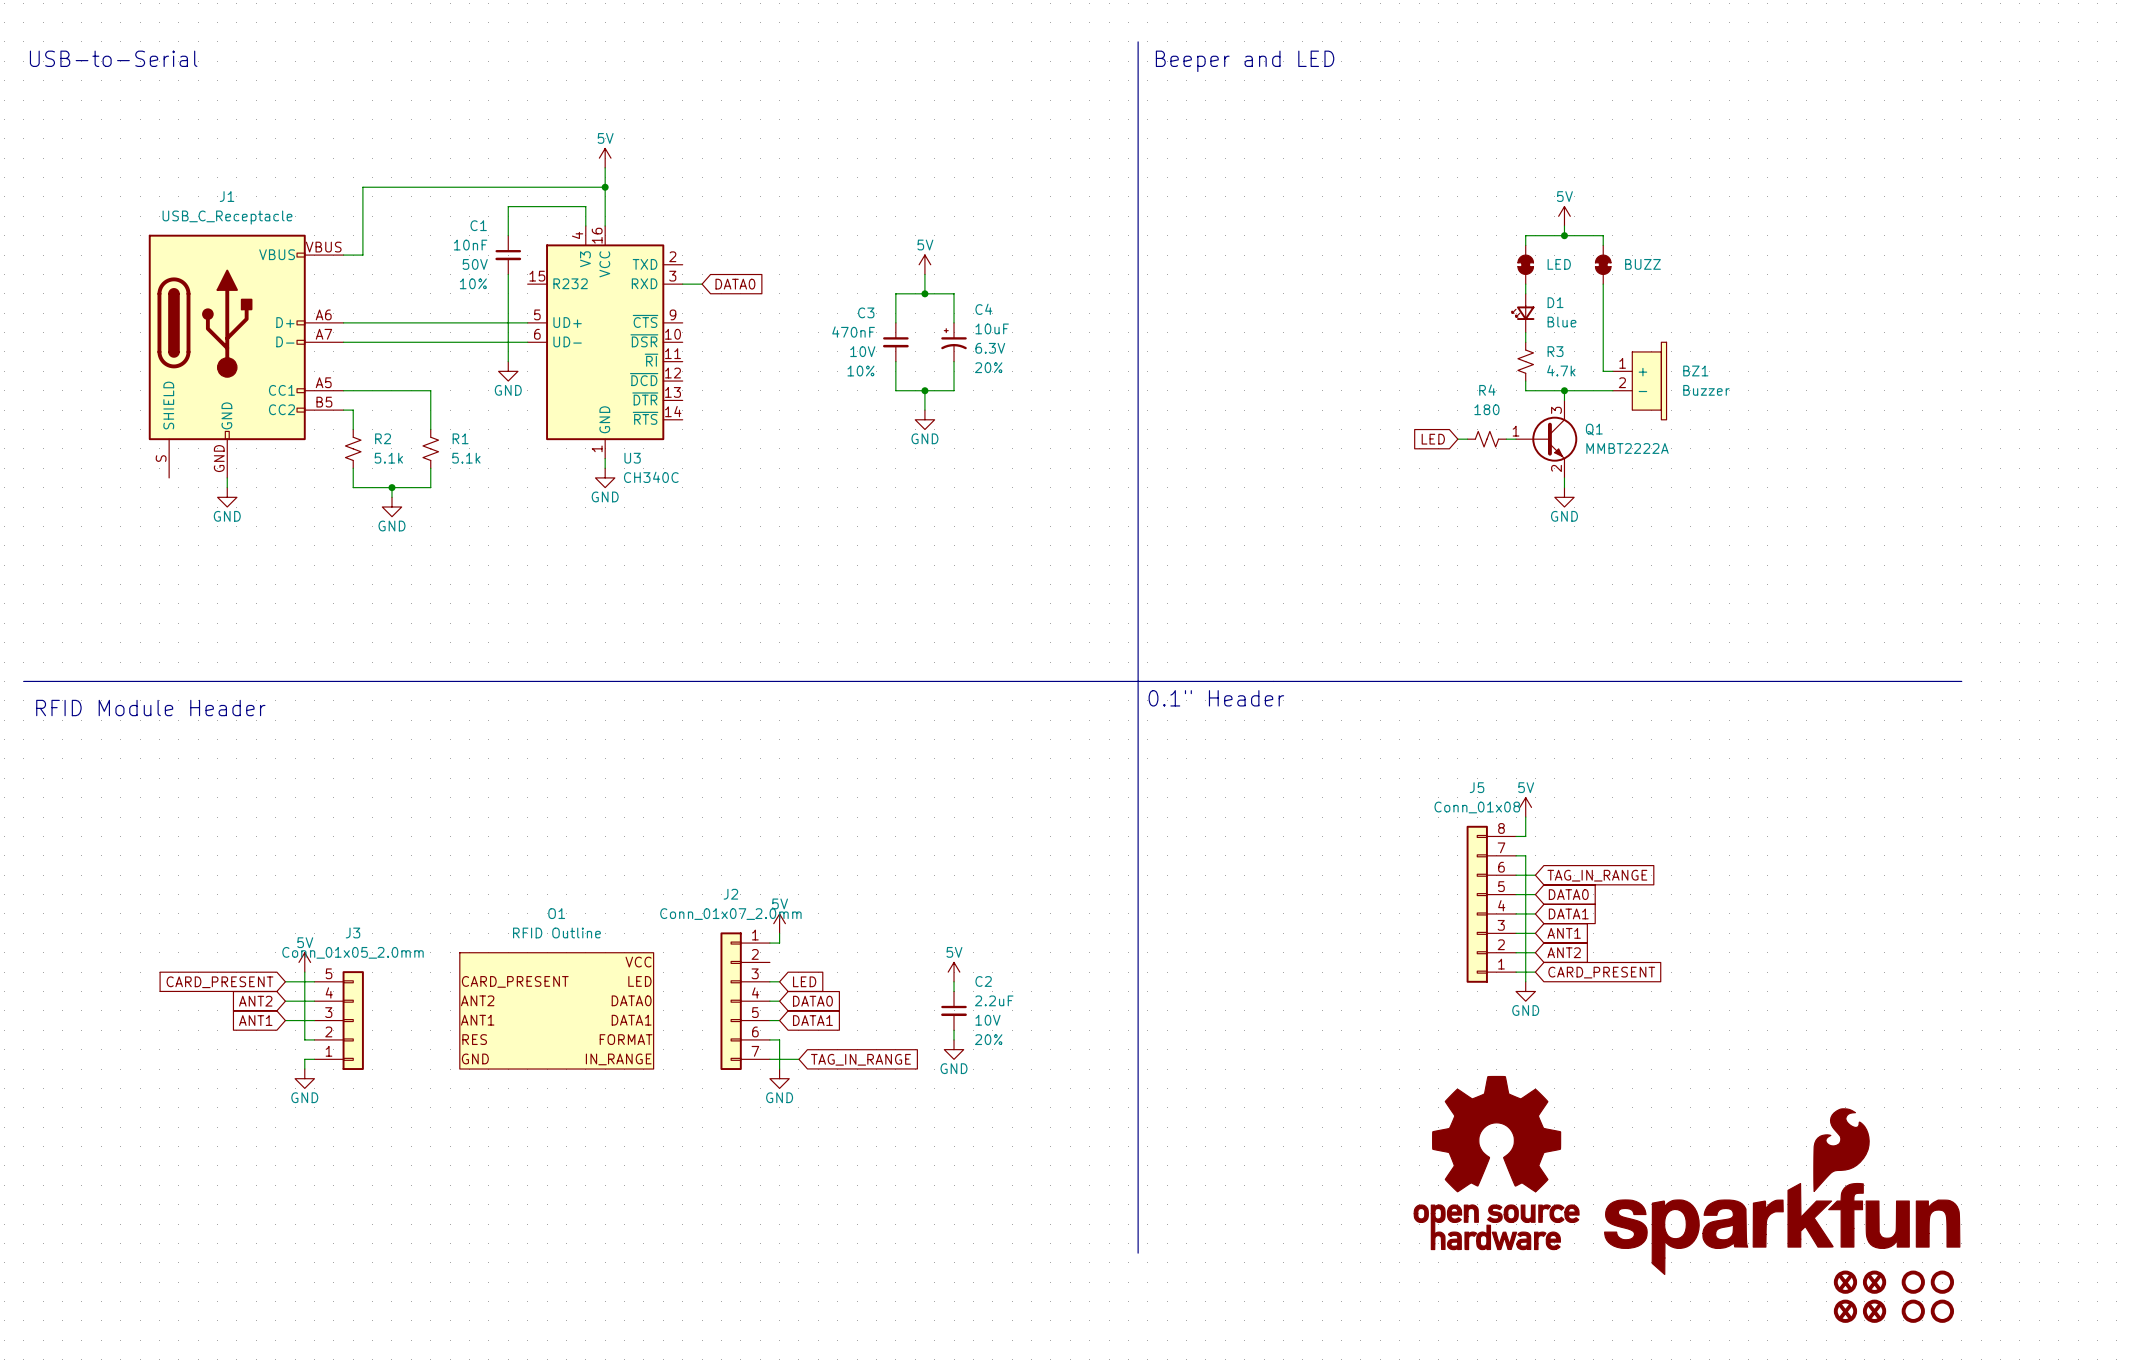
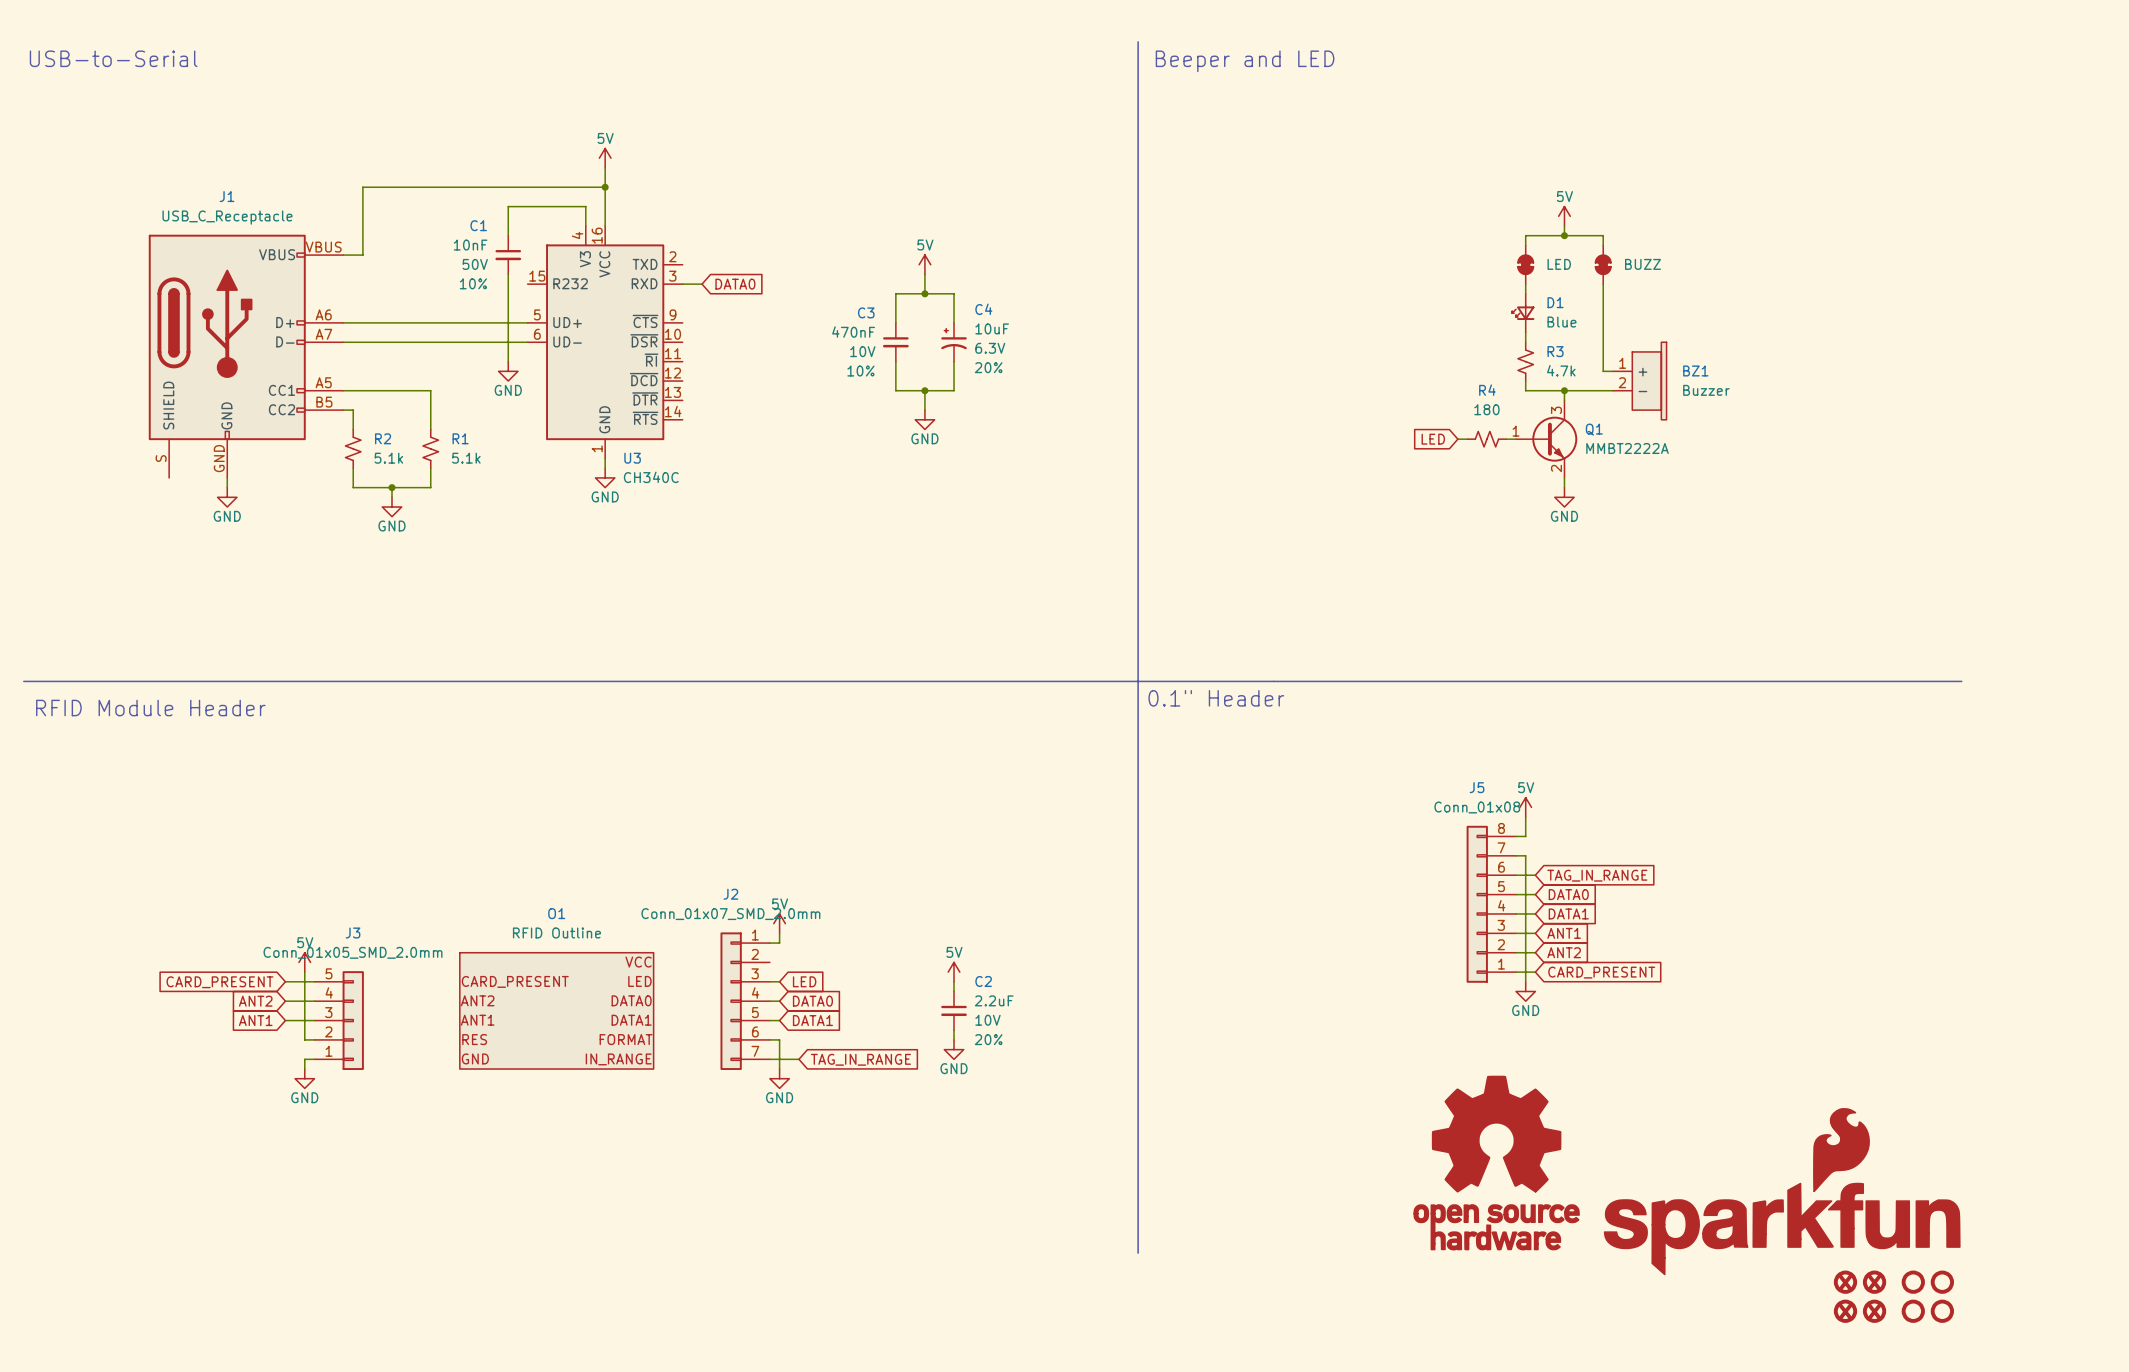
J2 value: Conn_01x07_2.0mm (730, 914) -> Conn_01x07_SMD_2.0mm (730, 914)
J3 value: Conn_01x05_2.0mm (353, 952) -> Conn_01x05_SMD_2.0mm (353, 952)

